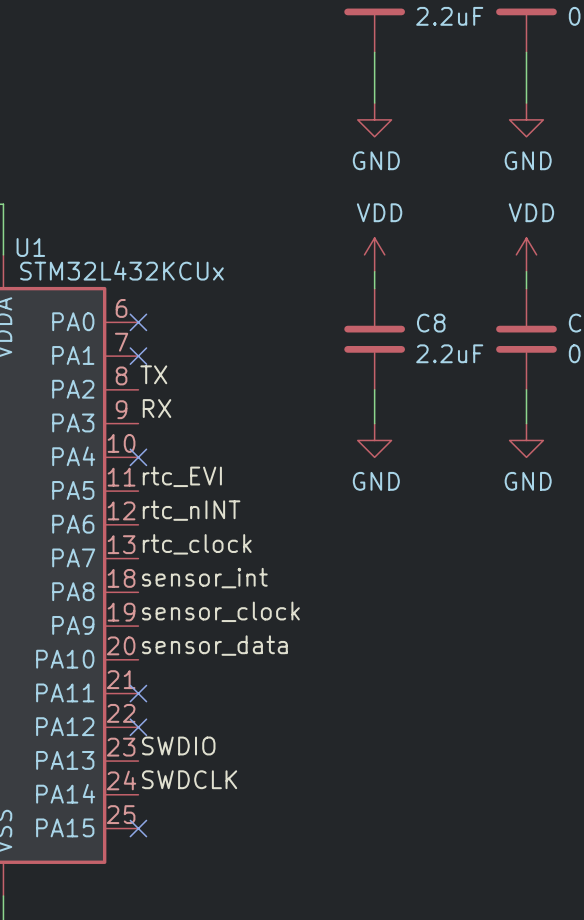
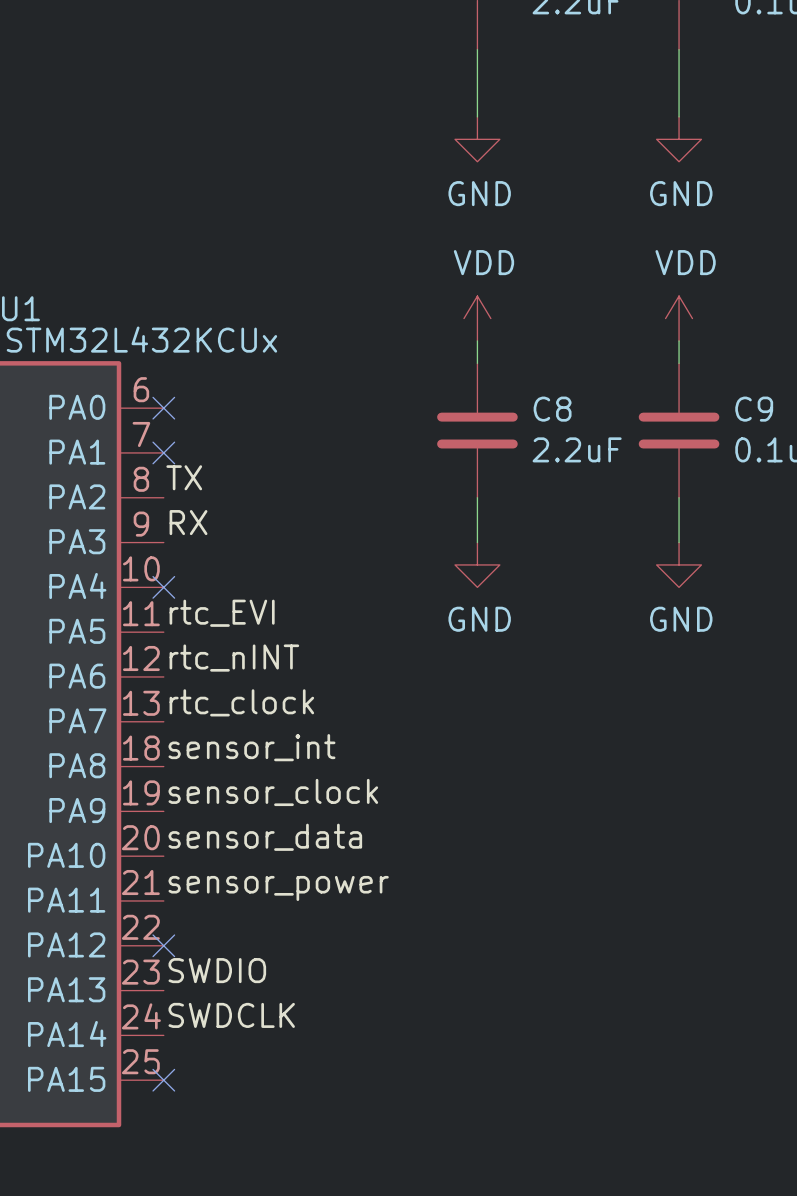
label: none -> sensor_power (278, 888)
no-connect mark: (138, 693) -> none

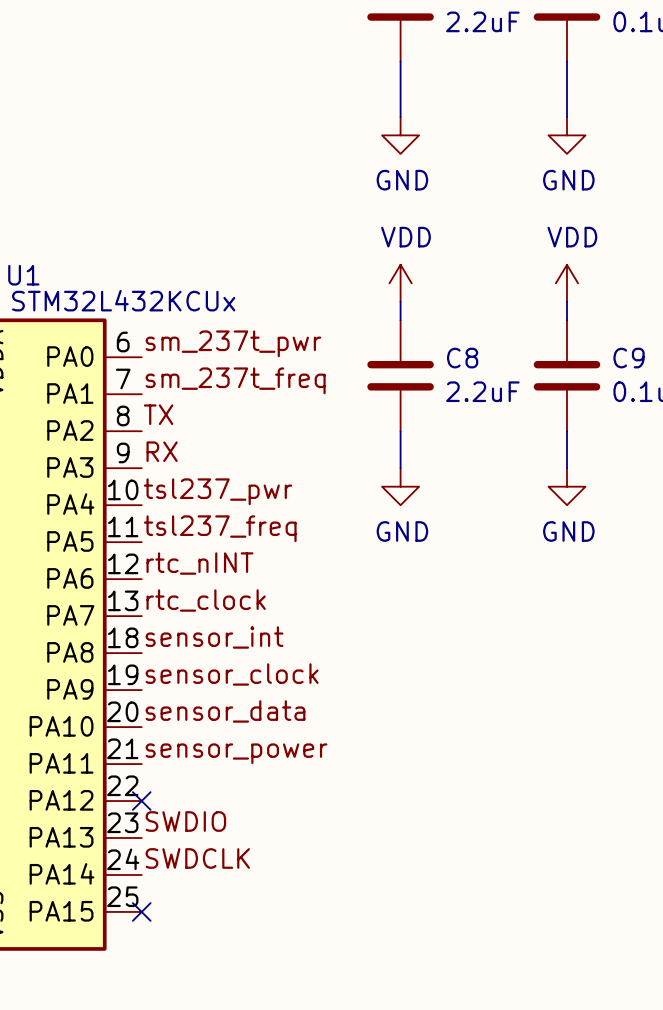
label: none -> sm_237t_pwr (233, 343)
no-connect mark: (163, 408) -> none
label: none -> sm_237t_freq (235, 380)
no-connect mark: (163, 452) -> none
label: none -> tsl237_pwr (218, 491)
no-connect mark: (163, 587) -> none
label: rtc_EVI (222, 613) -> tsl237_freq (220, 528)

